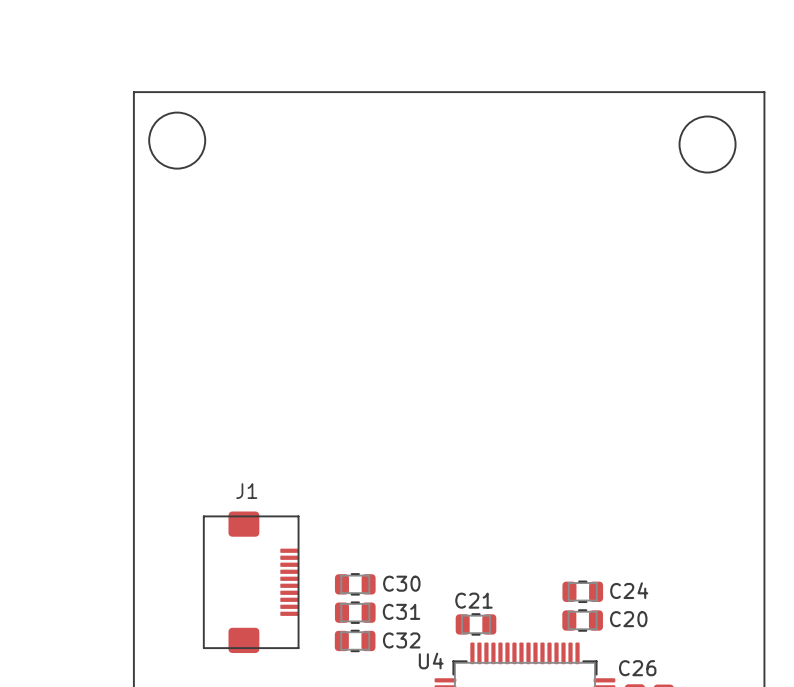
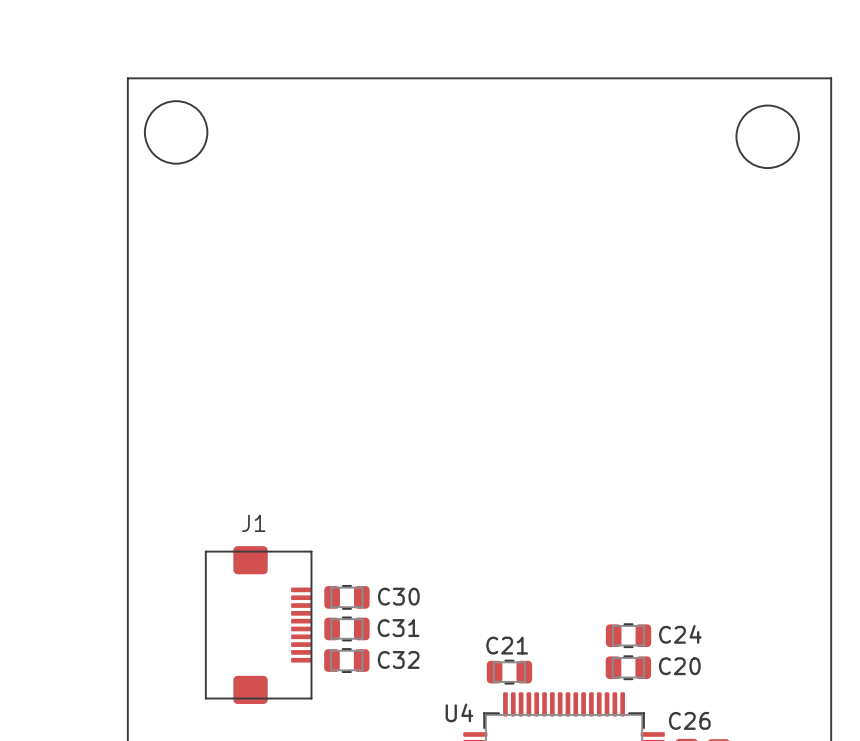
C30 position: (355, 584) -> (346, 597)
C31 position: (355, 612) -> (346, 628)
C32 position: (355, 640) -> (346, 660)

